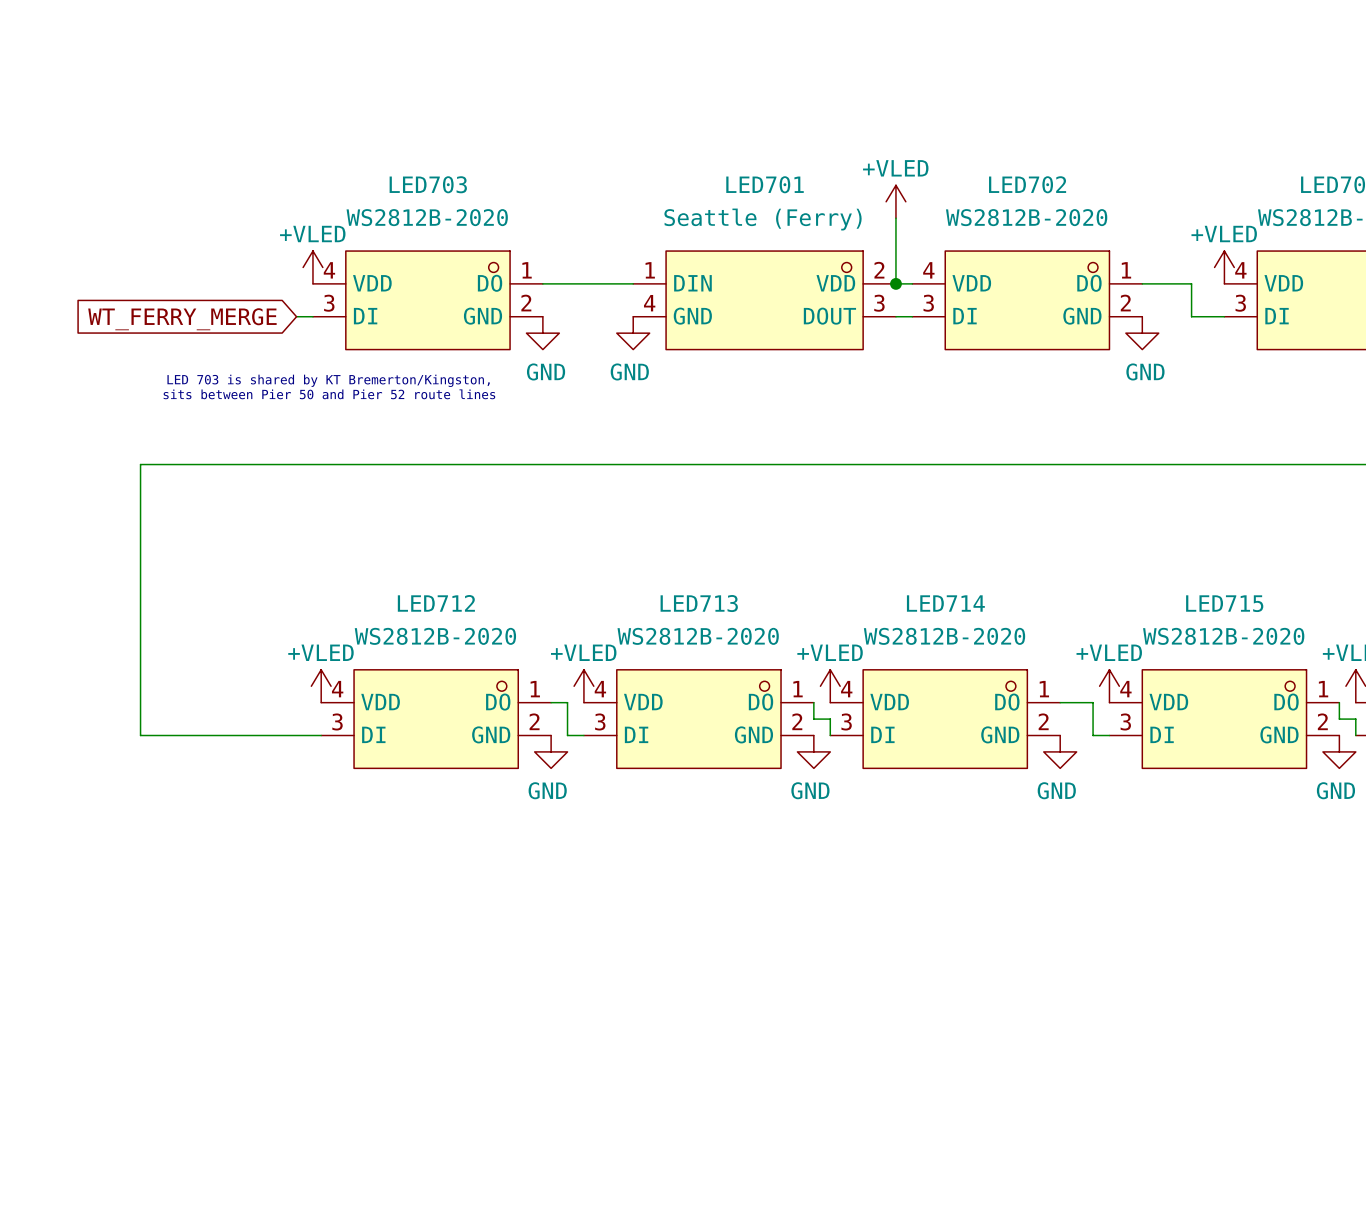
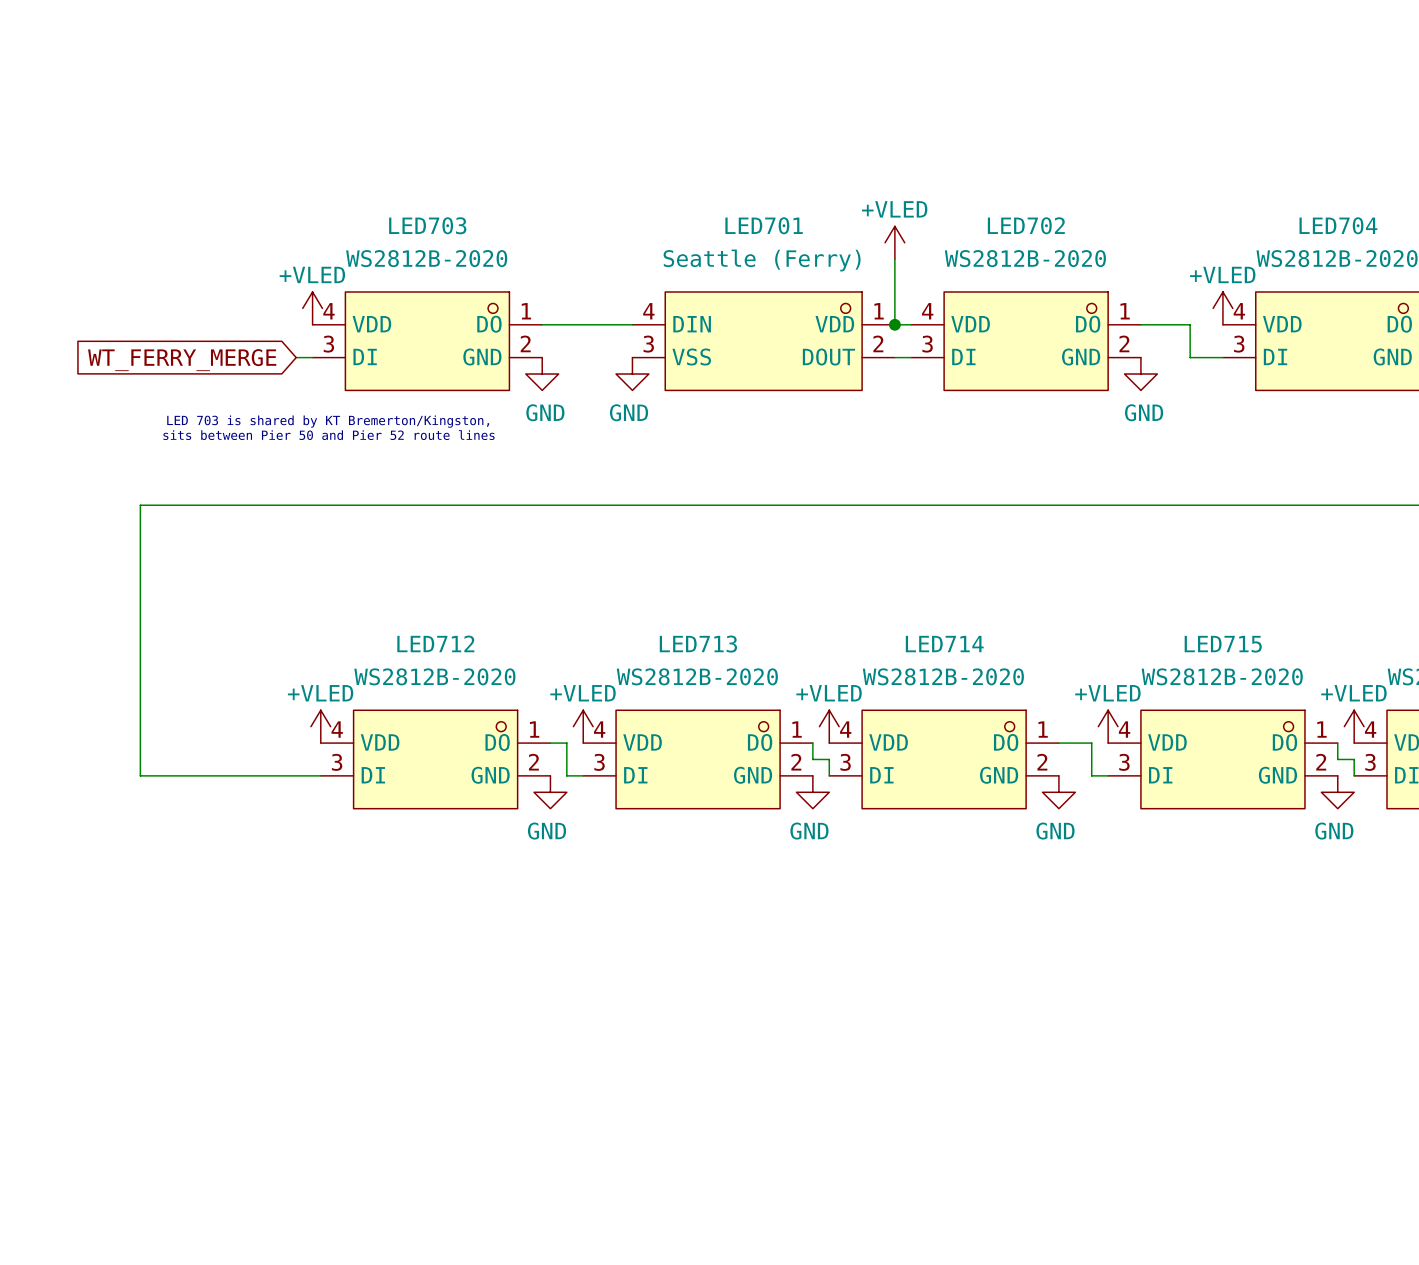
LED701 pin number: 1 (650, 270) -> 4 (648, 311)
LED701 pin number: 2 (879, 270) -> 1 (879, 311)
LED701 pin number: 4 (649, 303) -> 3 (648, 344)
LED701 pin number: 3 (879, 303) -> 2 (878, 343)
LED701 pin name: GND (692, 316) -> VSS (691, 357)

